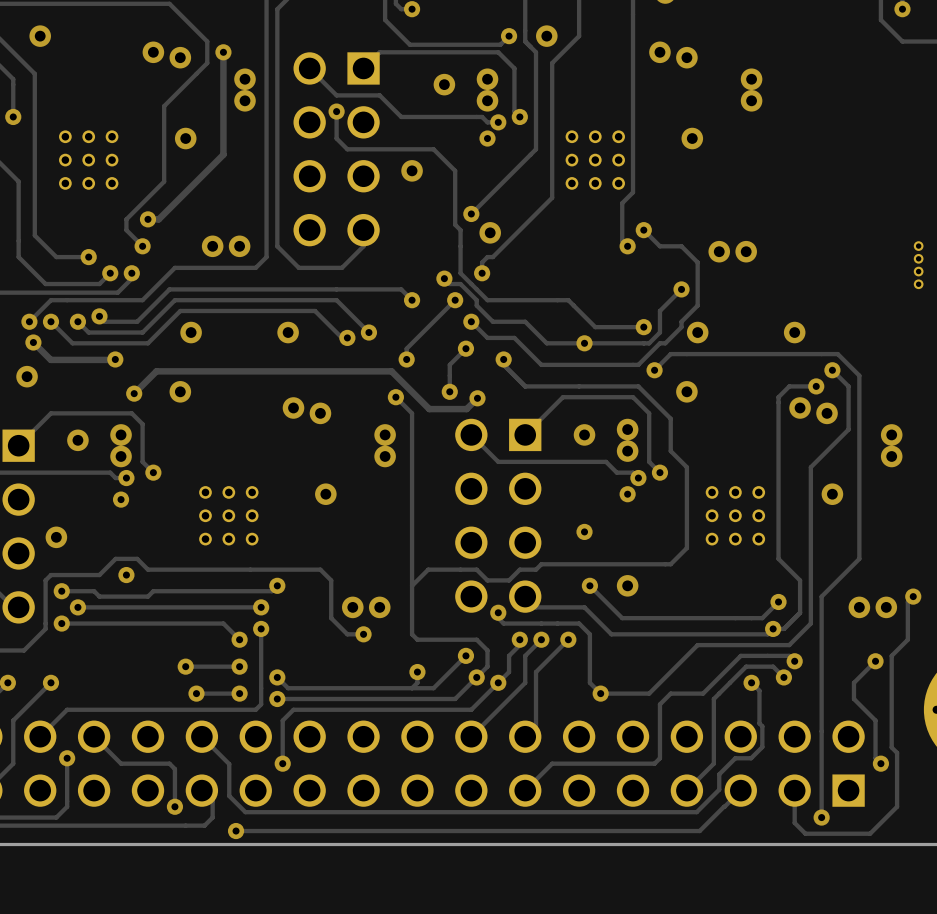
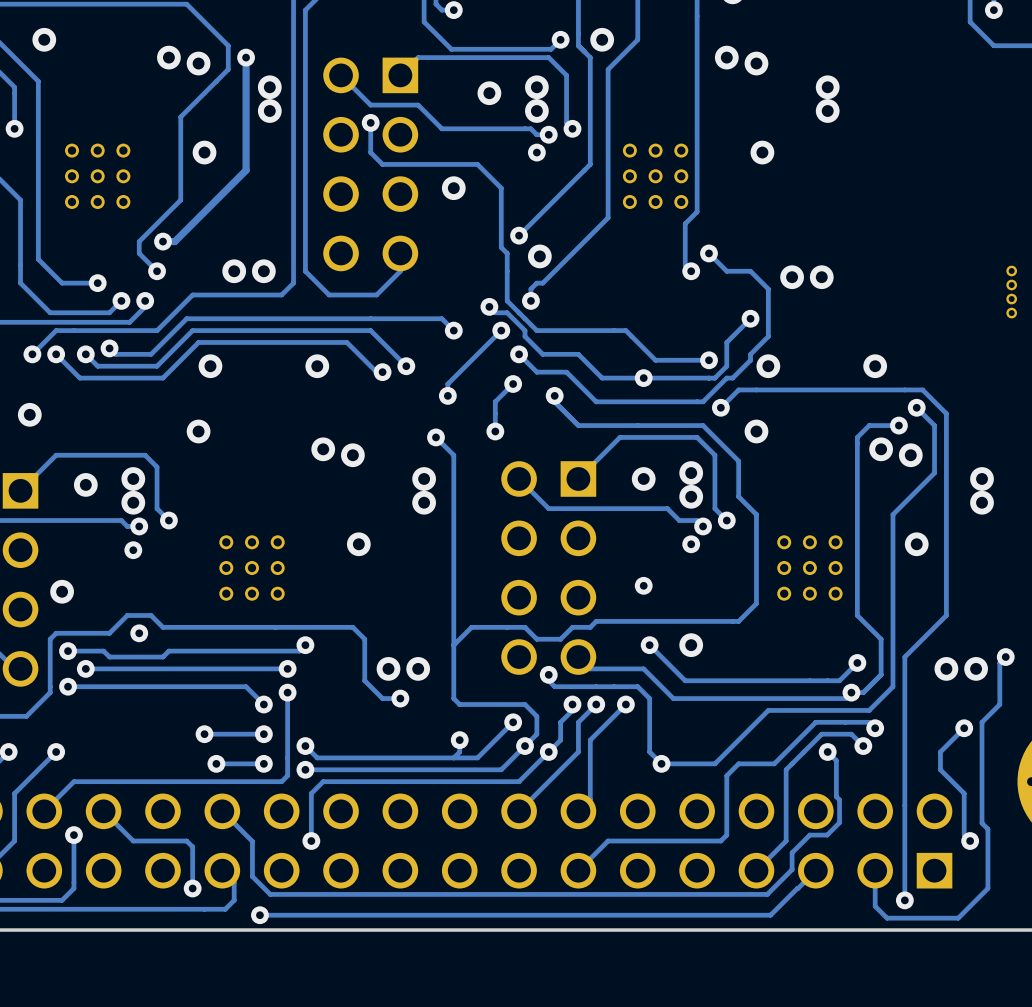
track: (33, 342) (50, 359) (115, 359) -> none
via: (33, 342) -> none
via: (115, 359) -> none
track: (134, 393) (156, 371) (391, 371) (429, 409) (466, 409) (477, 398) -> none
via: (134, 393) -> none
via: (477, 398) -> none

